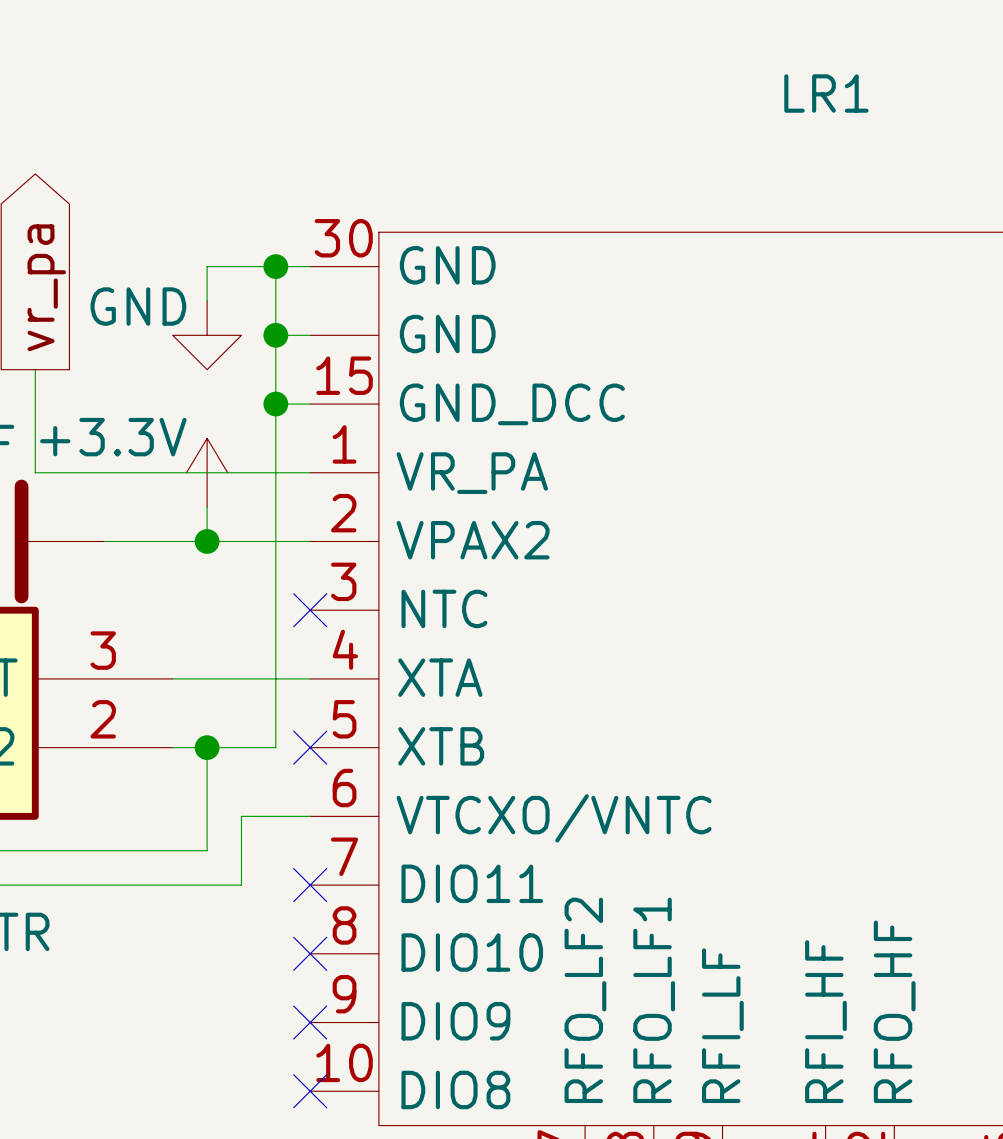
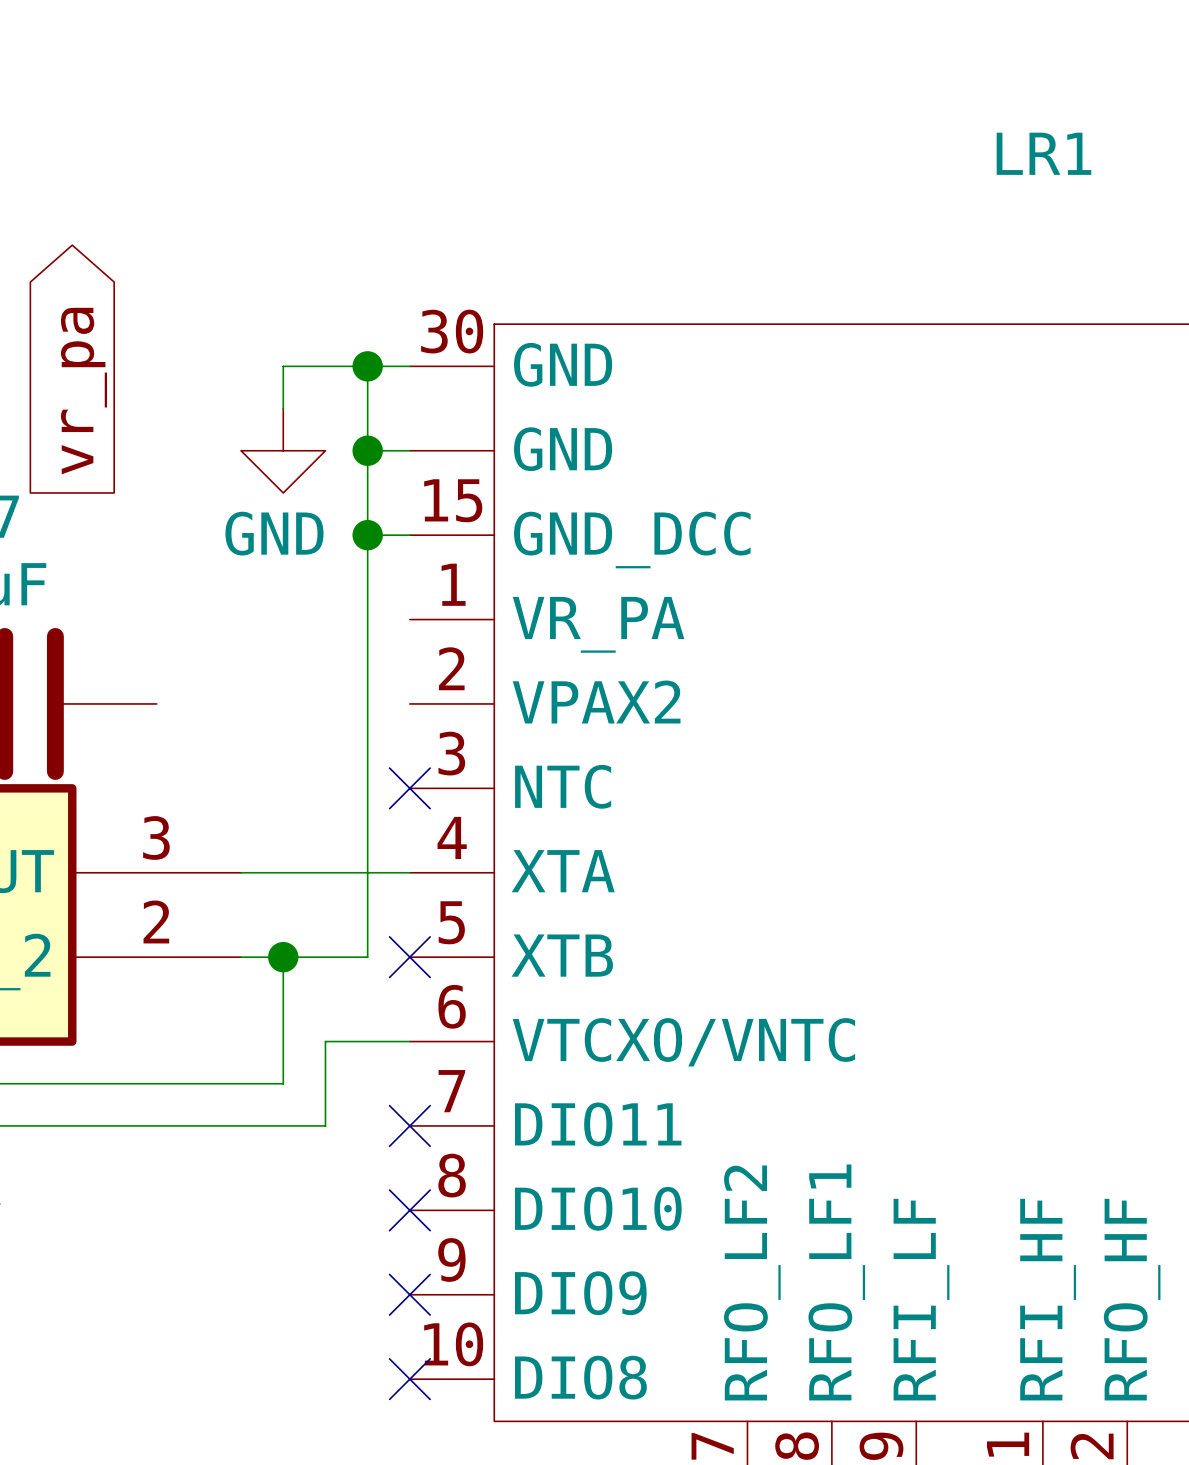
power symbol text position: GND (138, 306) -> GND (274, 533)
wire: (35, 369) (35, 472) (310, 472) -> none
power symbol: +3.3V (207, 472) -> none
wire: (207, 507) (207, 541) -> none
wire: (104, 541) (310, 541) -> none
junction: (207, 541) -> none

